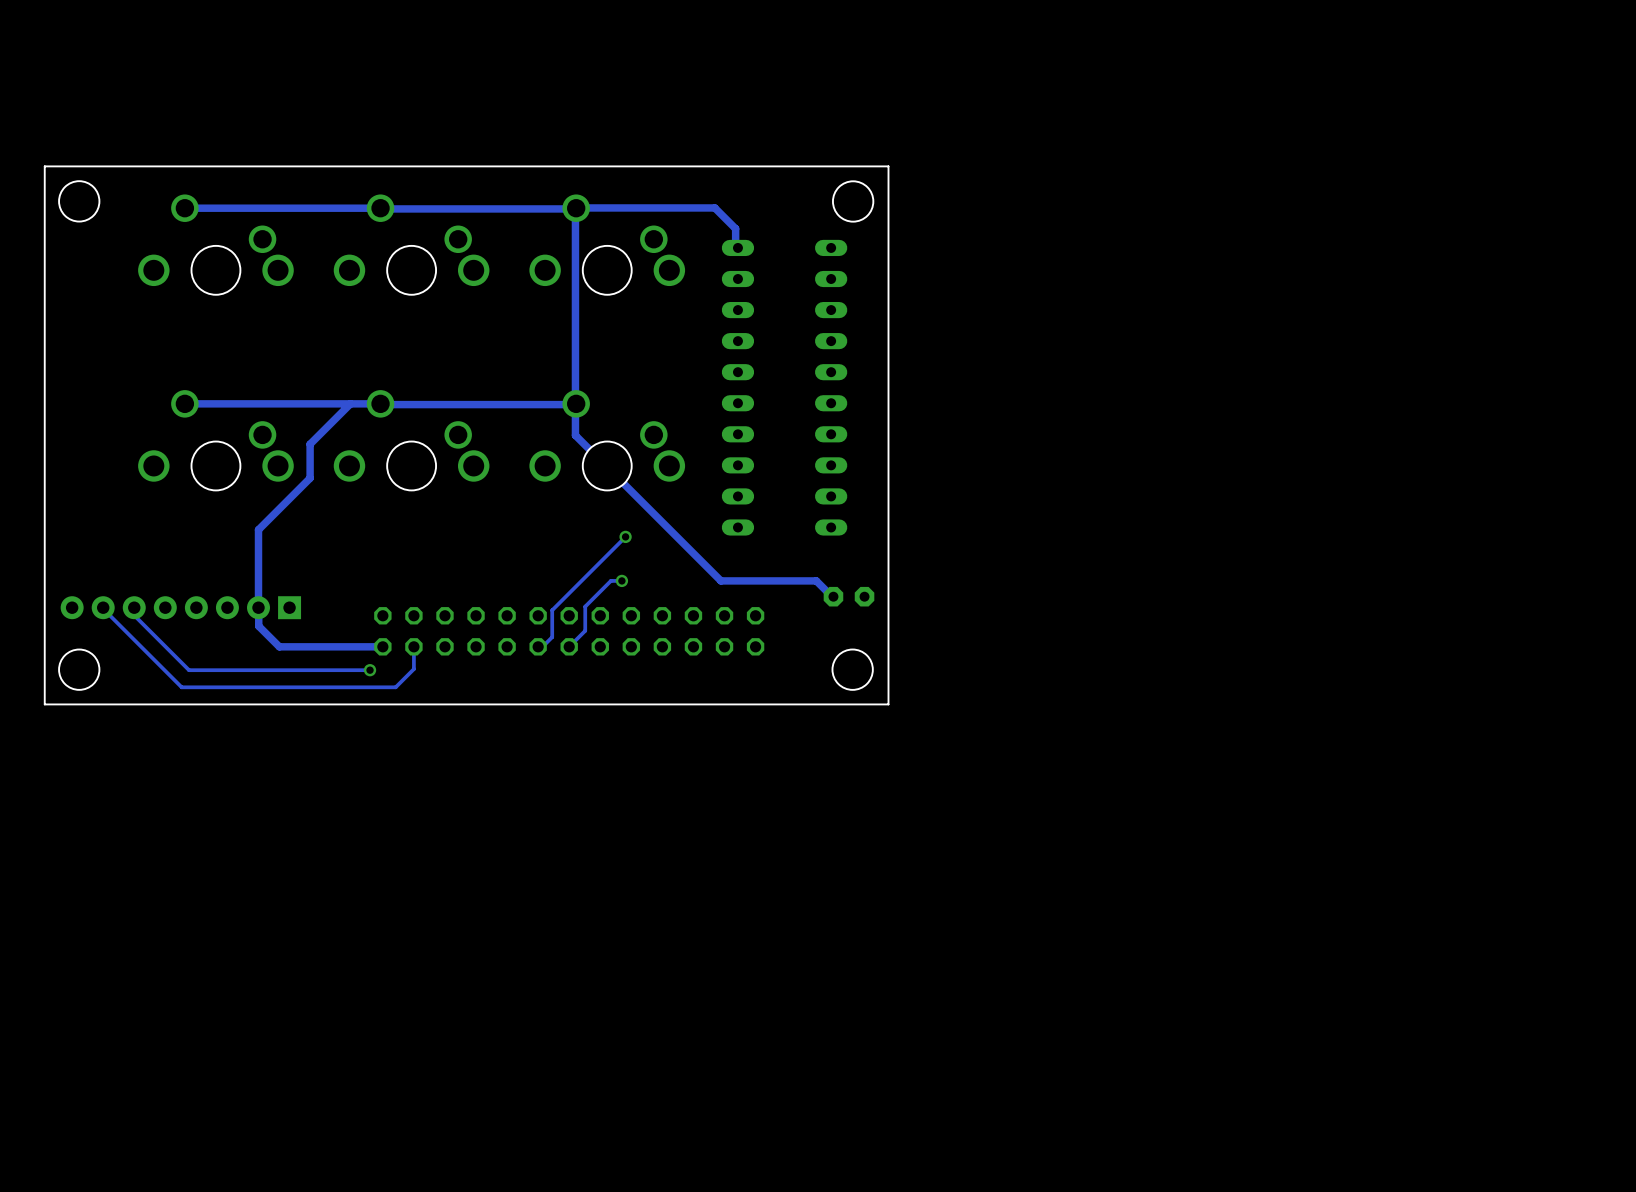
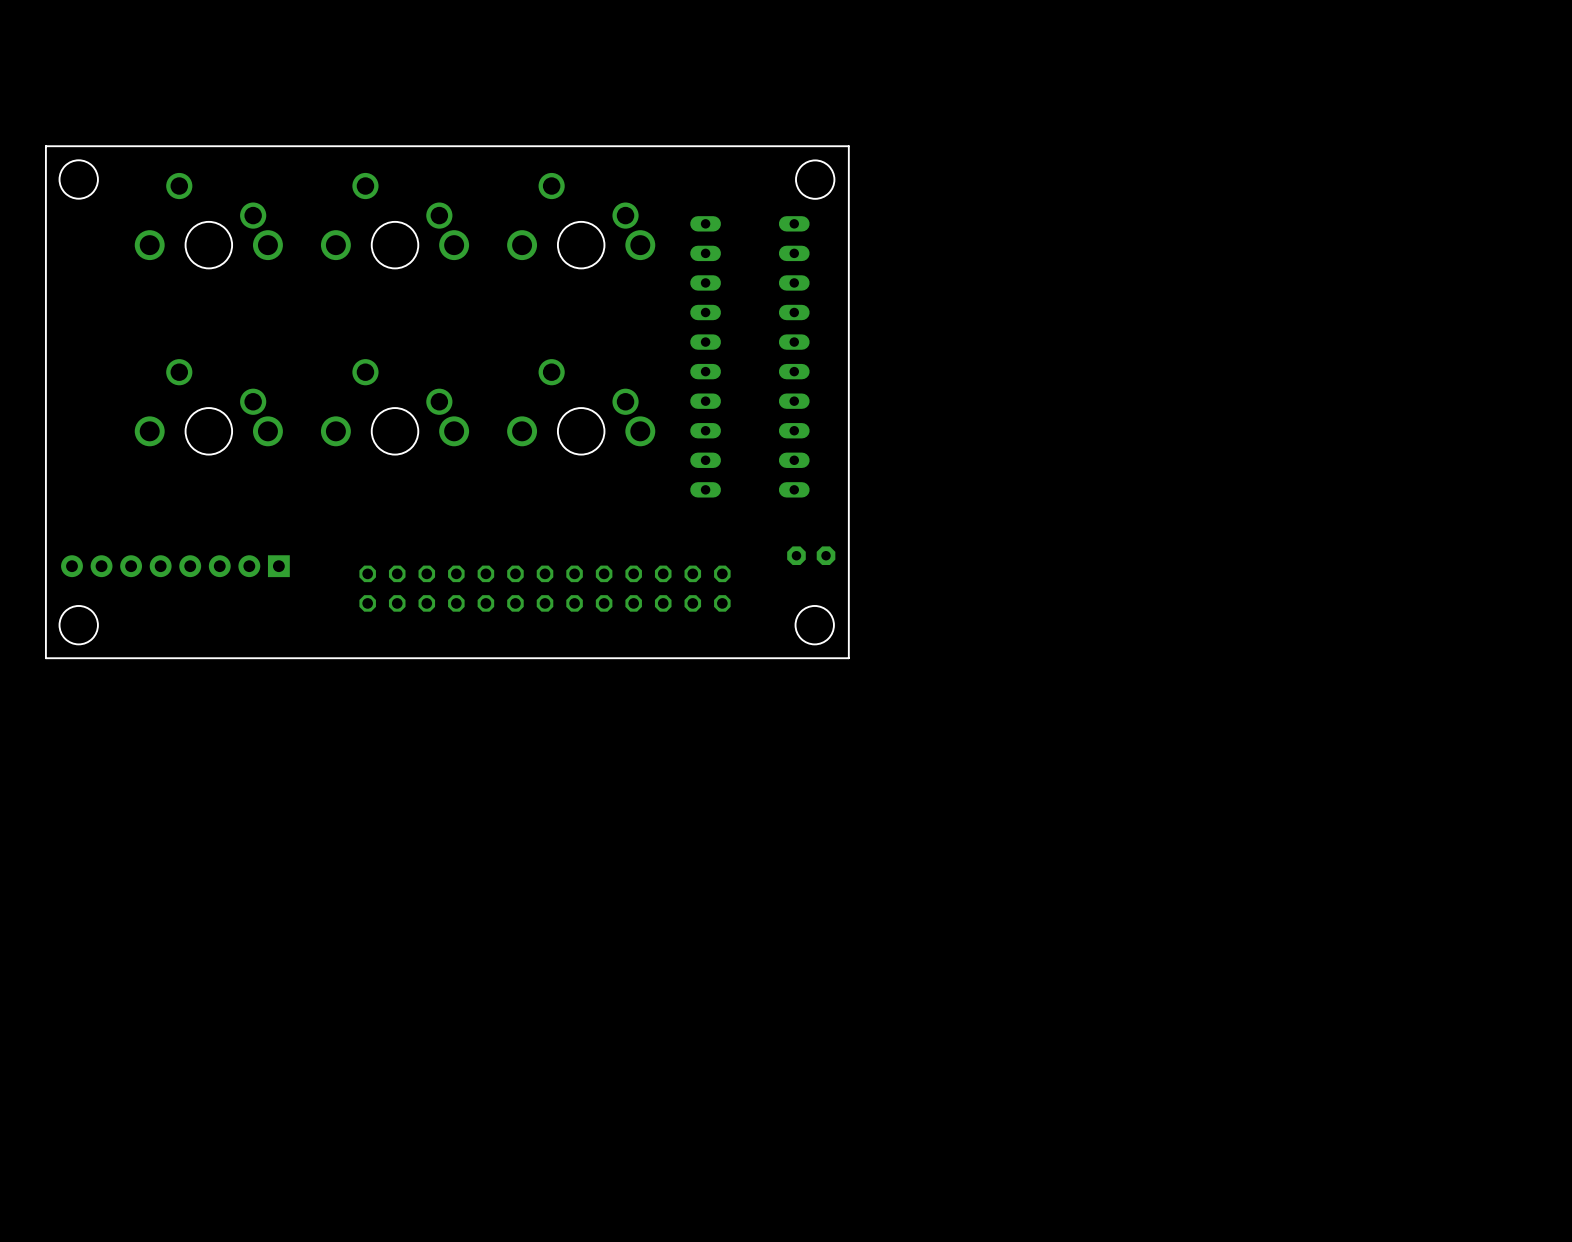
track: (184, 208) (575, 208) -> none
track: (575, 208) (575, 435) (720, 580) (816, 580) (833, 596) -> none
track: (575, 208) (714, 207) (735, 228) (735, 247) (737, 247) -> none
track: (350, 403) (310, 444) (310, 478) (258, 529) (258, 626) (279, 646) (382, 646) -> none
track: (576, 403) (184, 403) -> none
track: (625, 536) (552, 610) (552, 637) (542, 646) (538, 646) -> none
via: (625, 536) -> none
track: (621, 580) (610, 580) (585, 606) (585, 630) (569, 646) -> none
via: (621, 580) -> none
track: (103, 607) (181, 687) (395, 687) (413, 669) (413, 646) -> none
track: (134, 607) (134, 615) (189, 670) (370, 670) -> none
via: (370, 670) -> none

